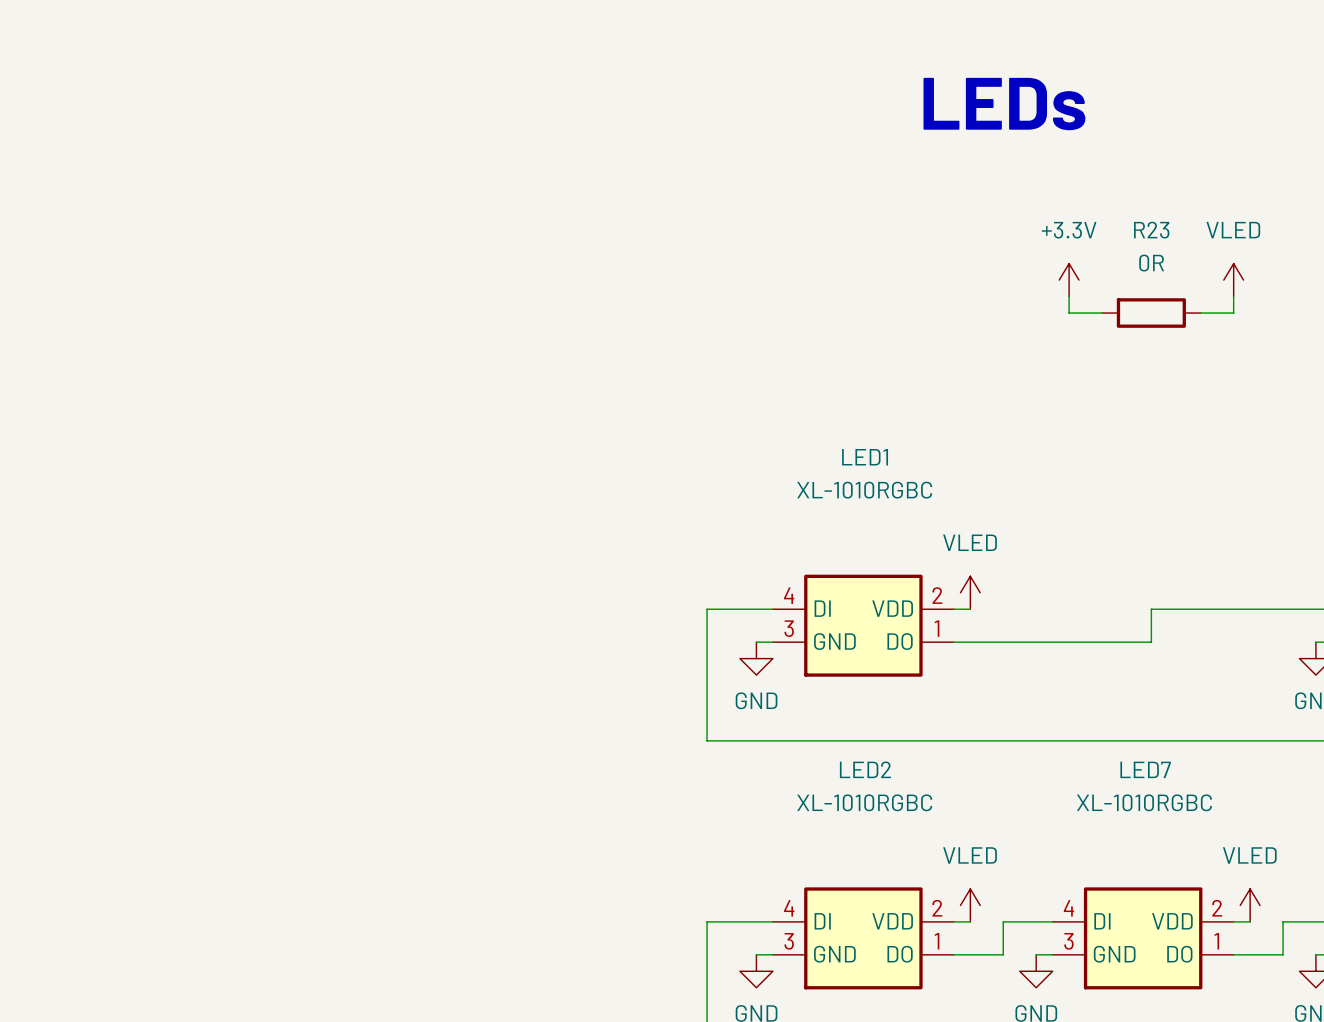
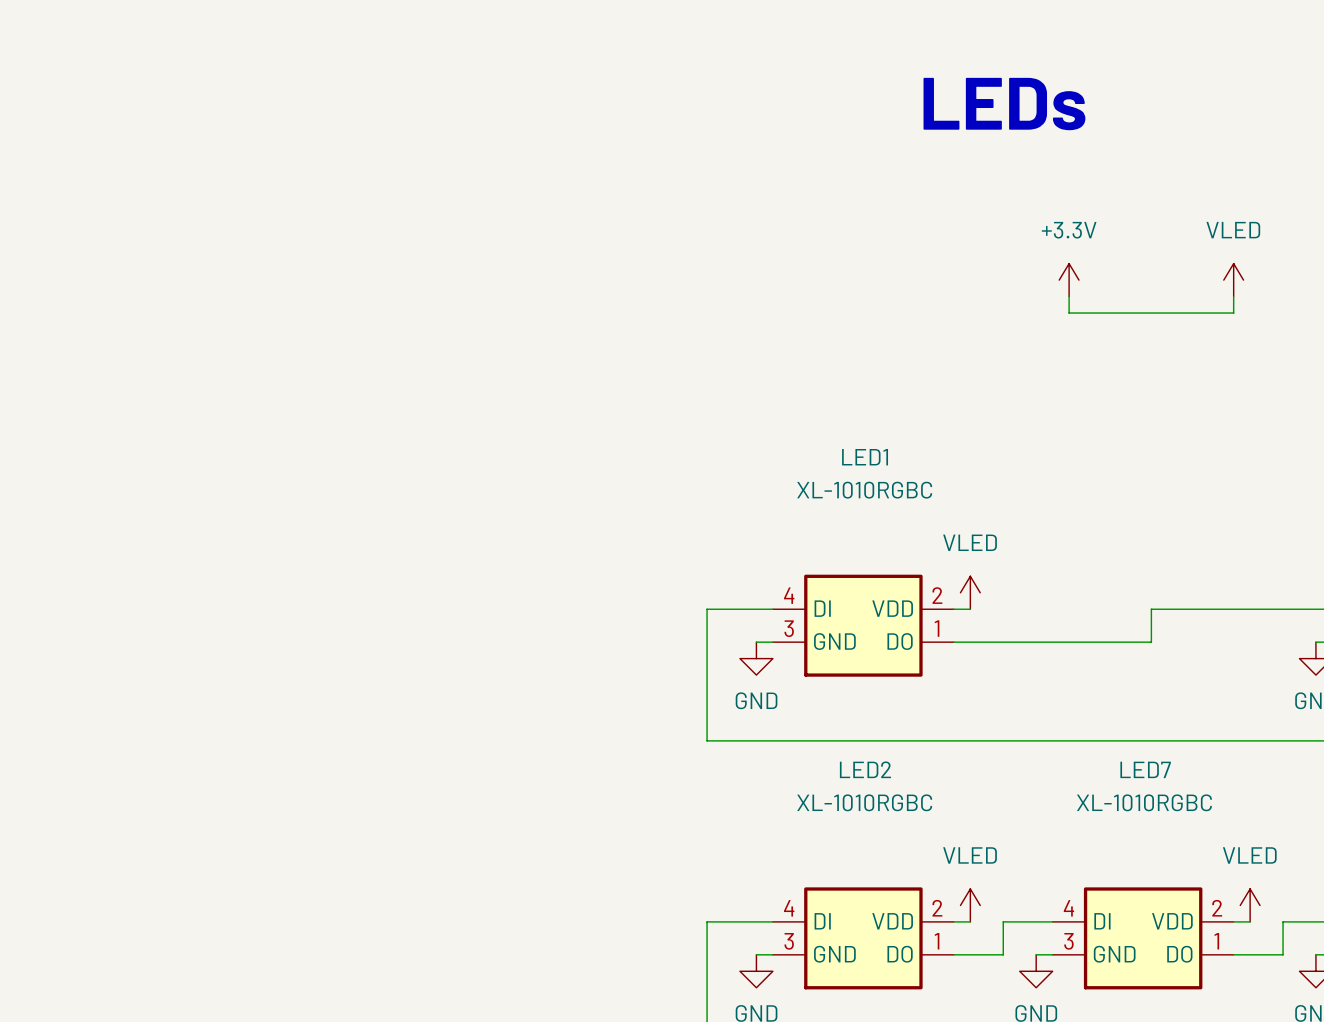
wire: none -> (1102, 313) (1200, 313)
R23: 0R (1151, 313) -> none

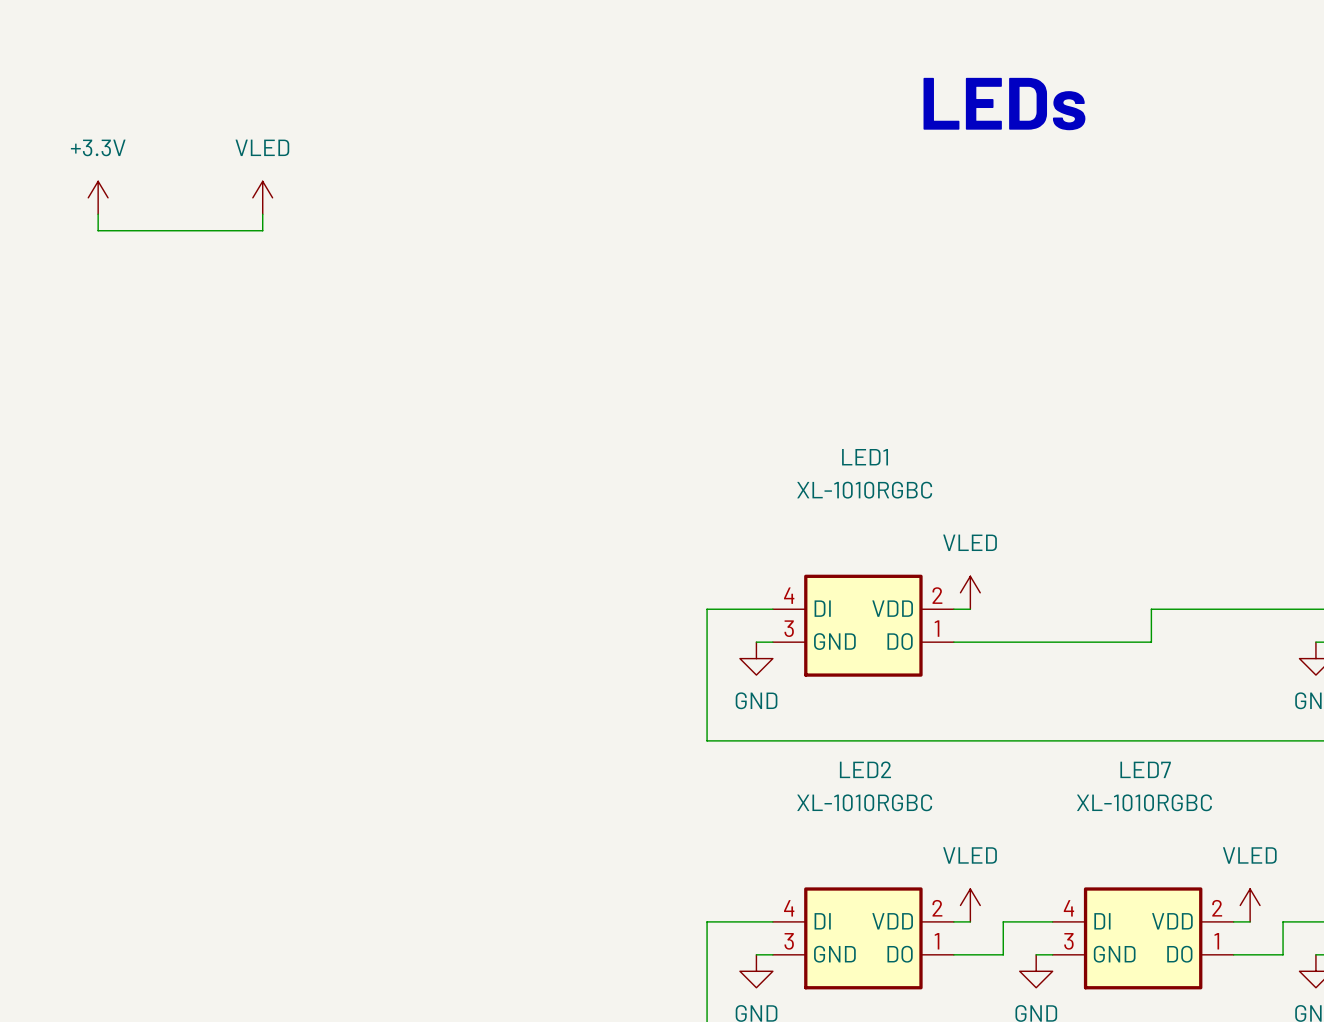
power symbol: none -> +3.3V (98, 197)
power symbol: none -> VLED (262, 197)
wire: none -> (98, 214) (98, 230) (262, 230) (262, 214)
power symbol: +3.3V (1069, 280) -> none
power symbol: VLED (1233, 280) -> none
wire: (1069, 296) (1069, 313) (1233, 313) (1233, 296) -> none

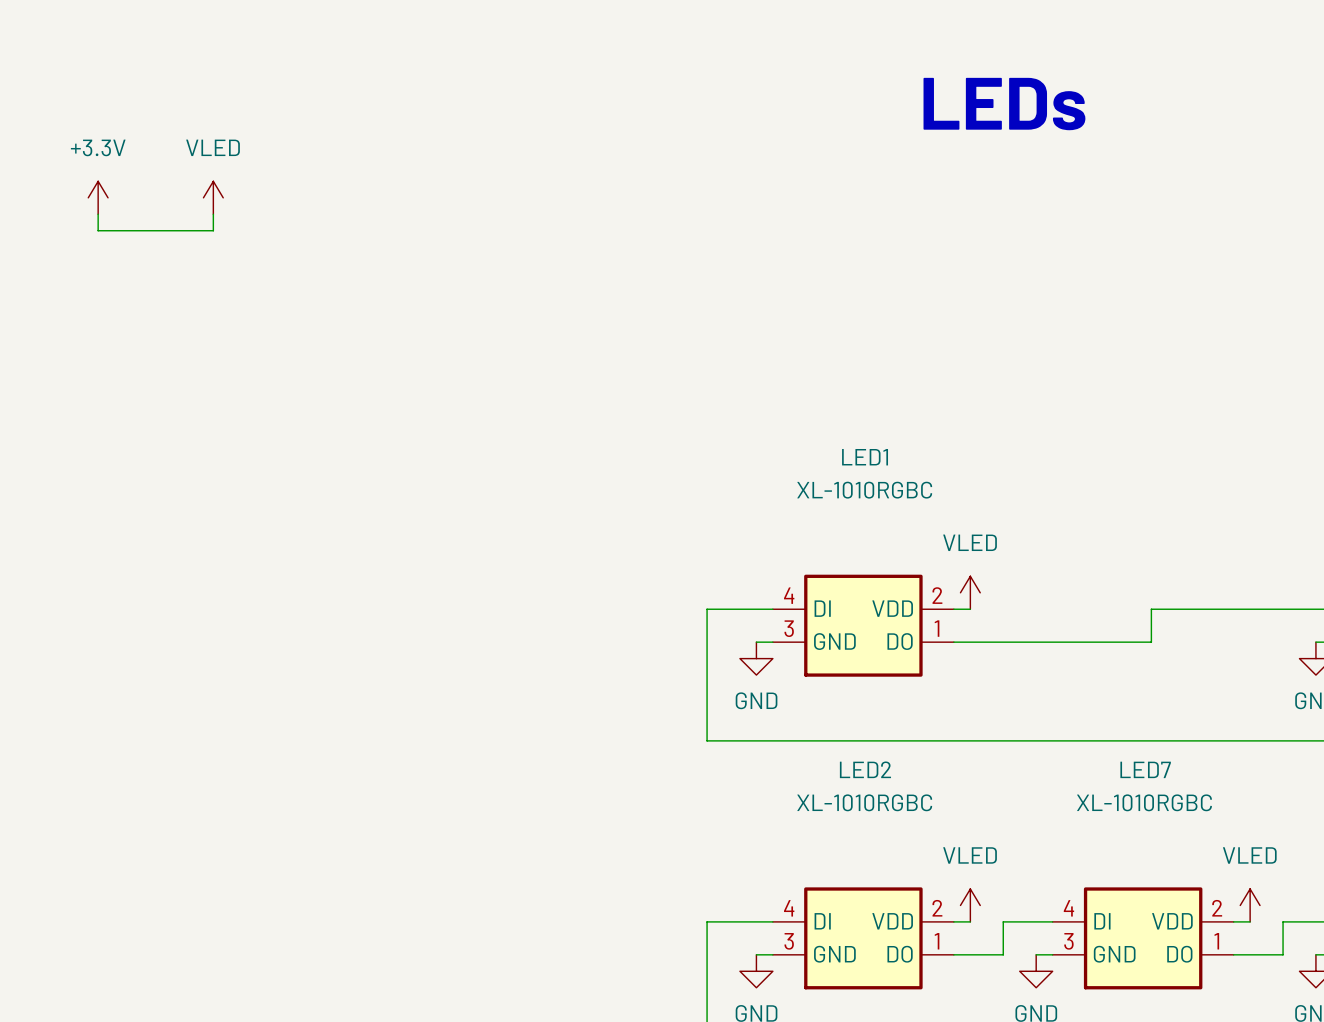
power symbol position: VLED (262, 197) -> VLED (213, 197)
wire: (262, 214) (262, 230) (213, 230) -> (213, 214) (213, 230)

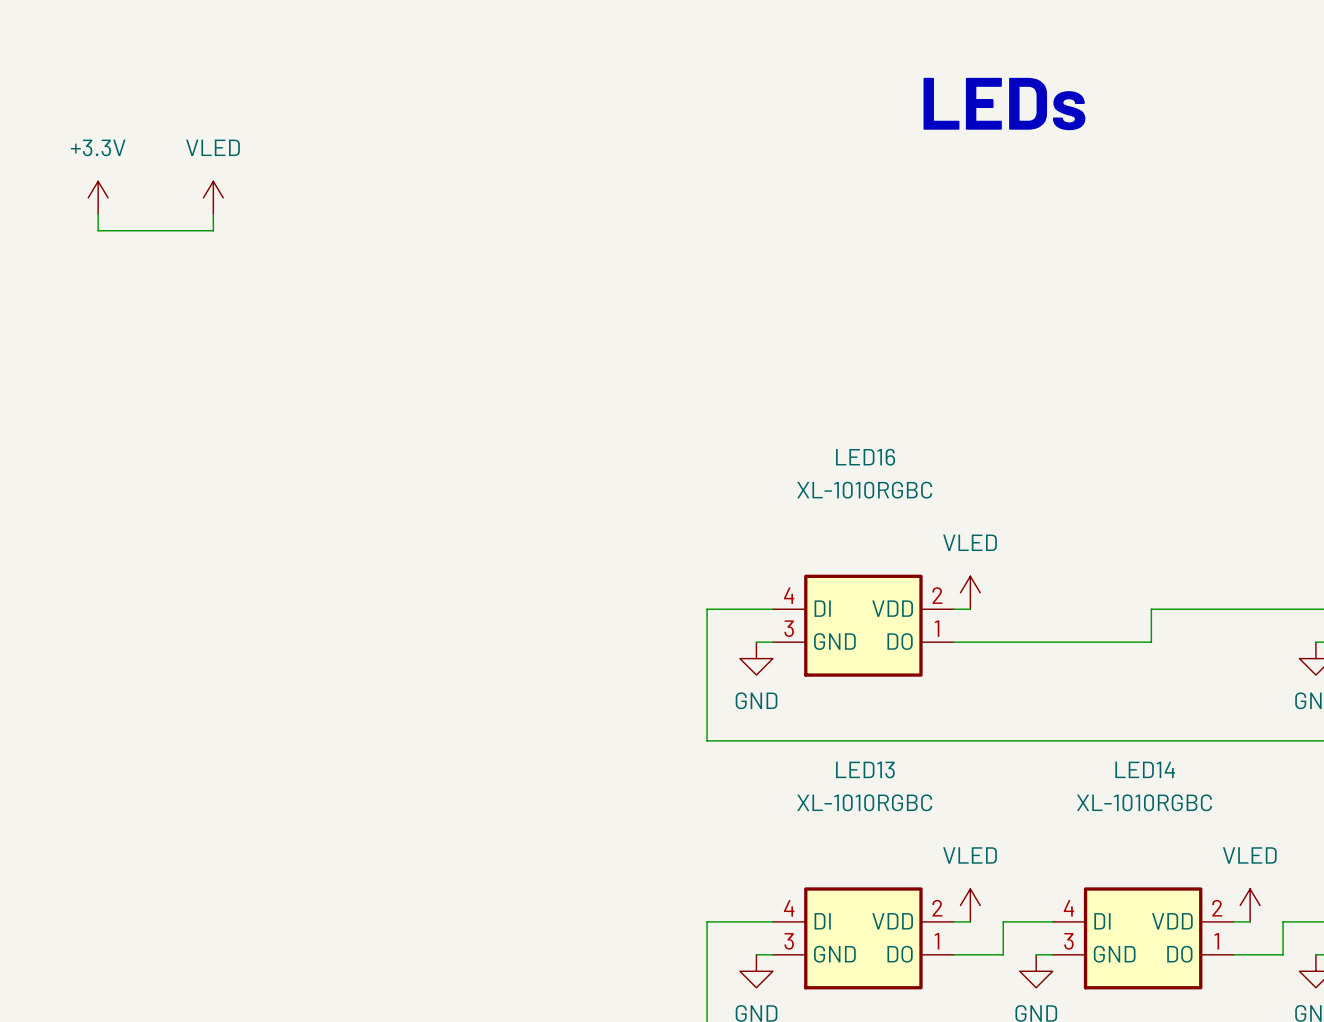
LED1 name: LED1 (865, 457) -> LED16 (865, 457)
LED2 name: LED2 (865, 769) -> LED13 (865, 769)
LED7 name: LED7 (1145, 769) -> LED14 (1145, 769)

